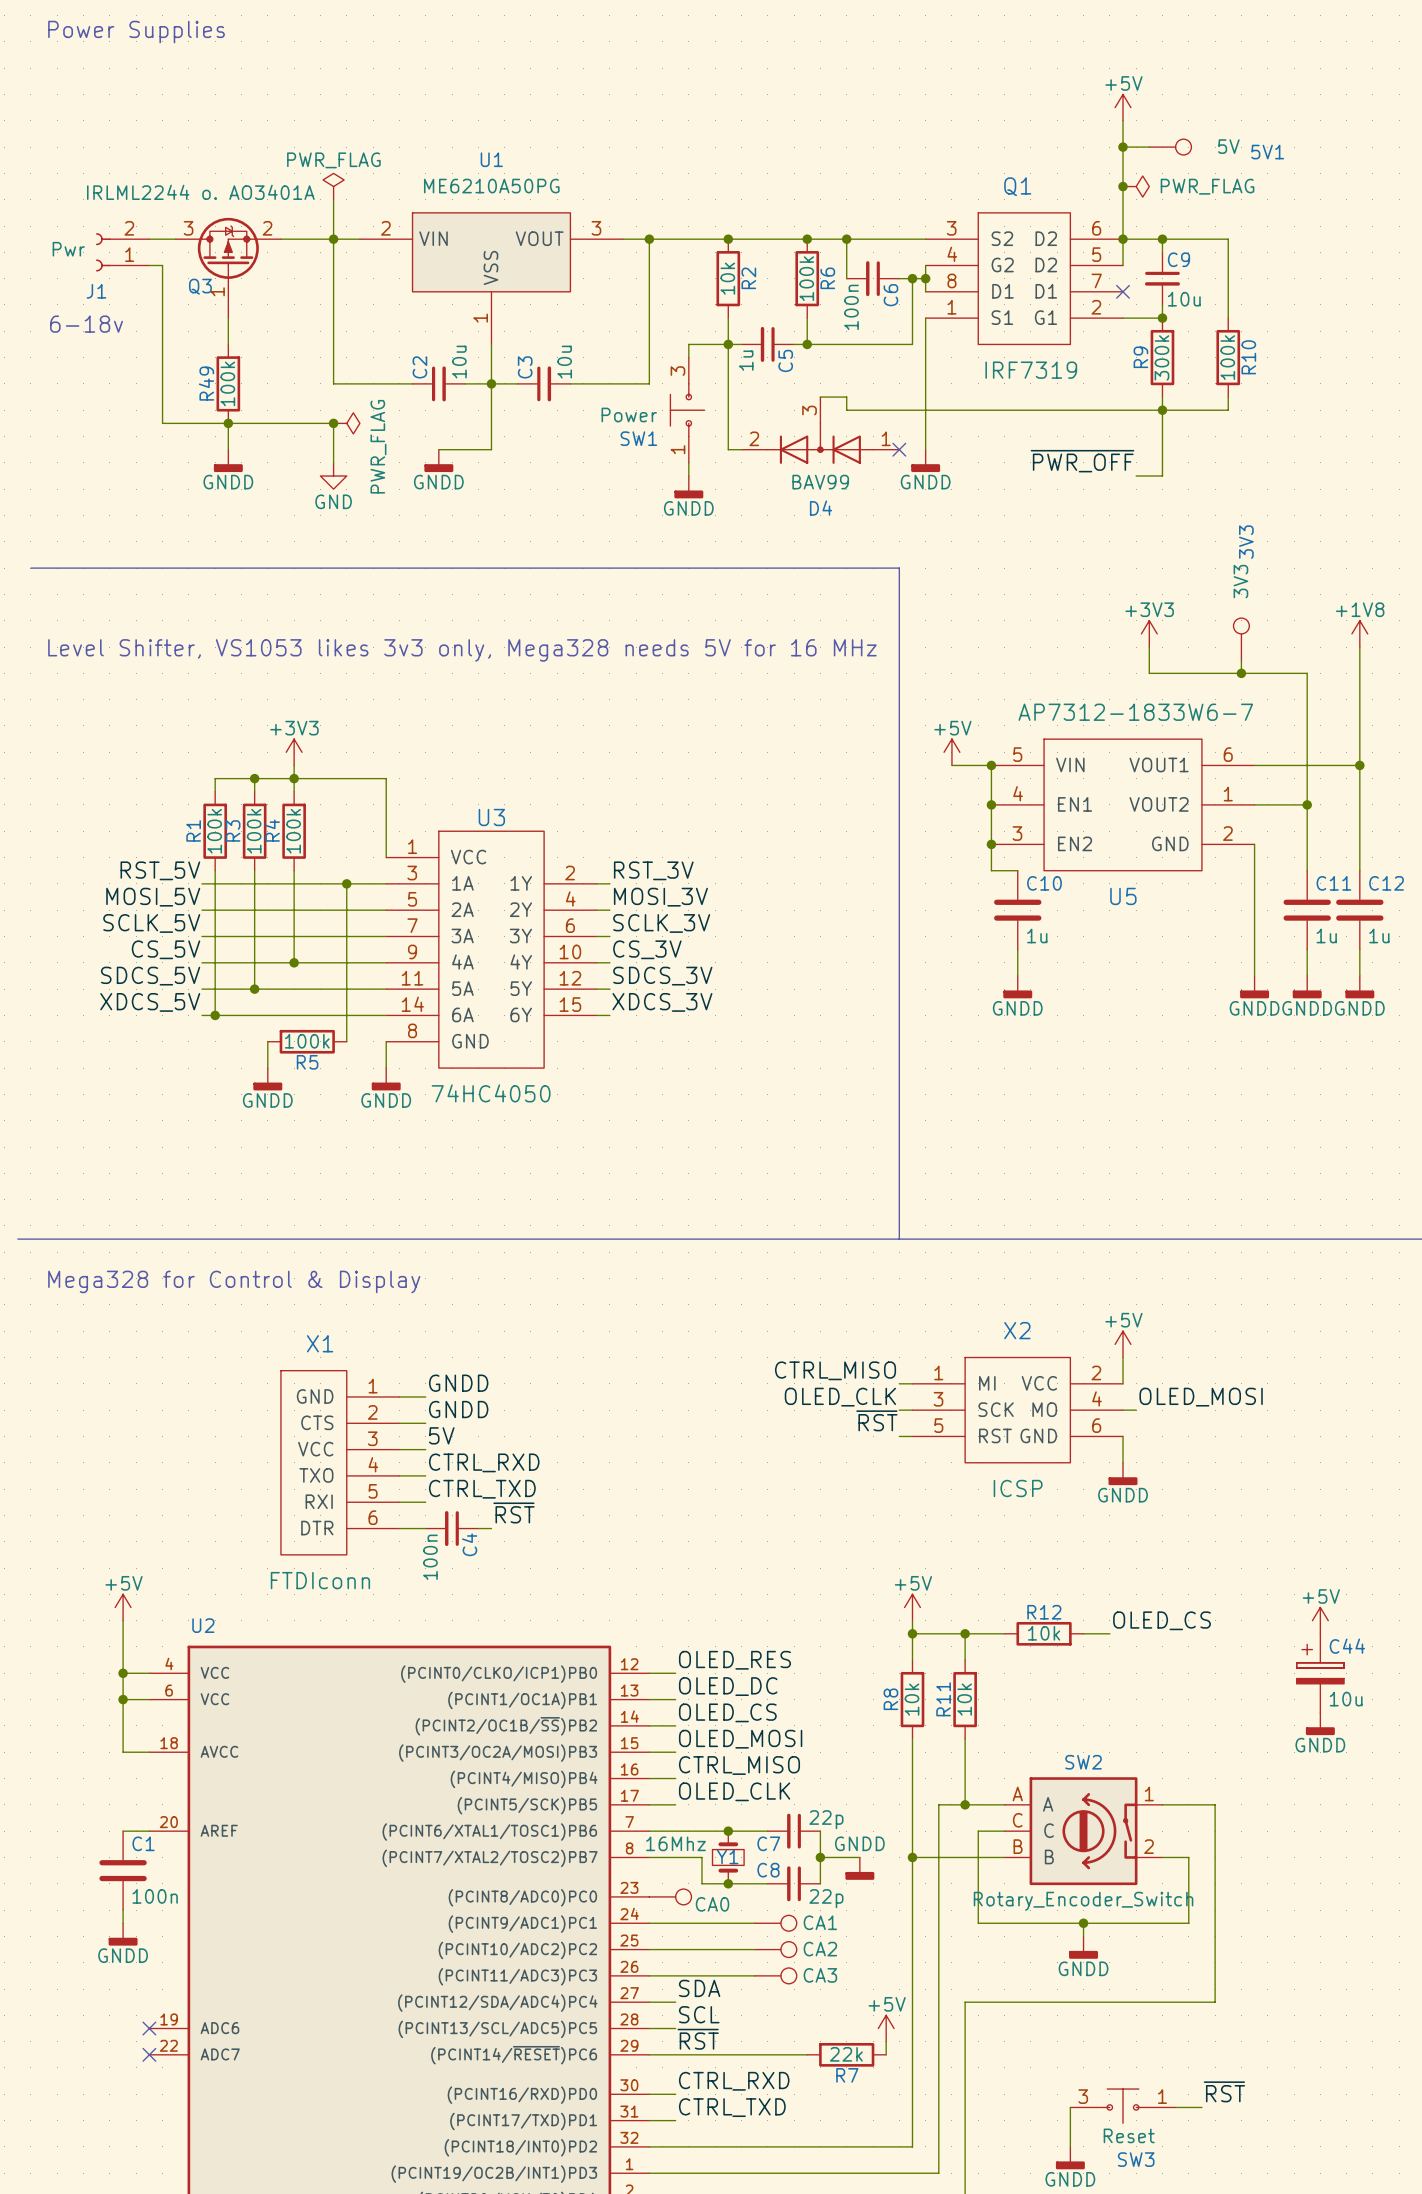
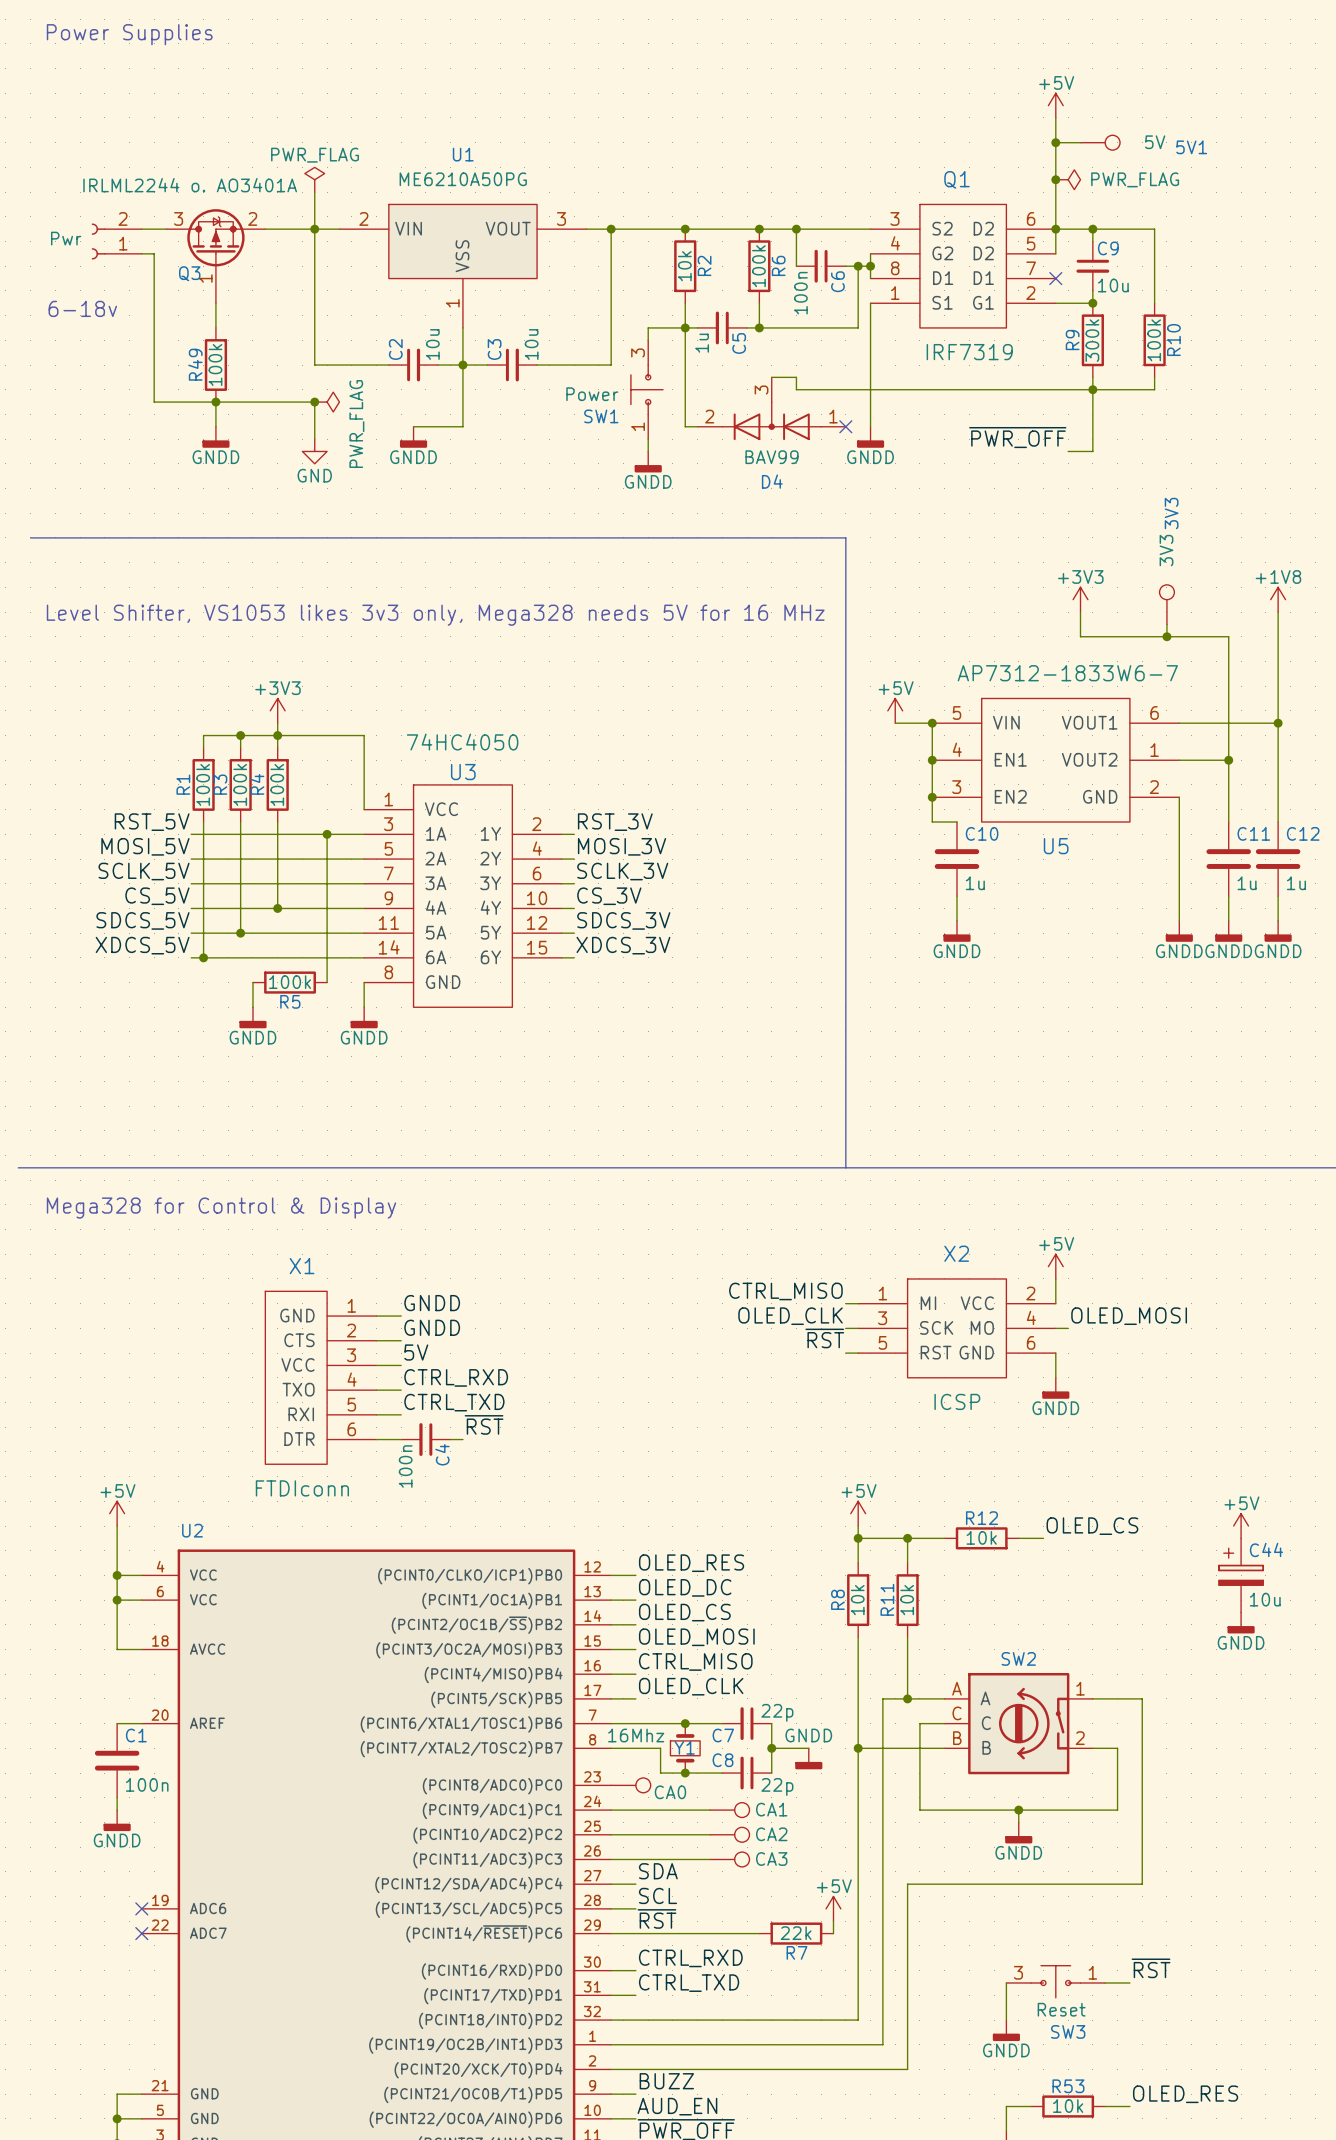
J1 name: J1 (96, 291) -> none
U3 value position: 74HC4050 (491, 1093) -> 74HC4050 (462, 742)
SW2 value: Rotary_Encoder_Switch (1083, 1901) -> none

